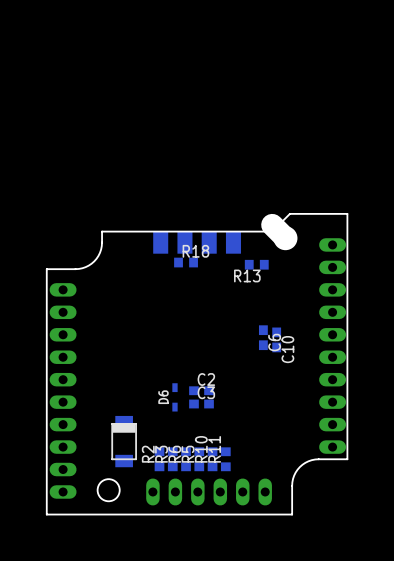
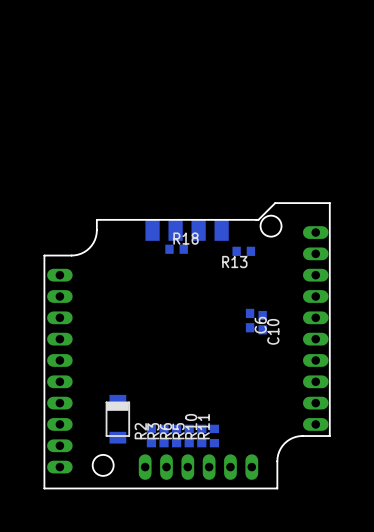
board edge: (272, 224) (285, 238) -> none
C2: (201, 390) -> none
D6: (174, 397) -> none
C3: (201, 404) -> none

